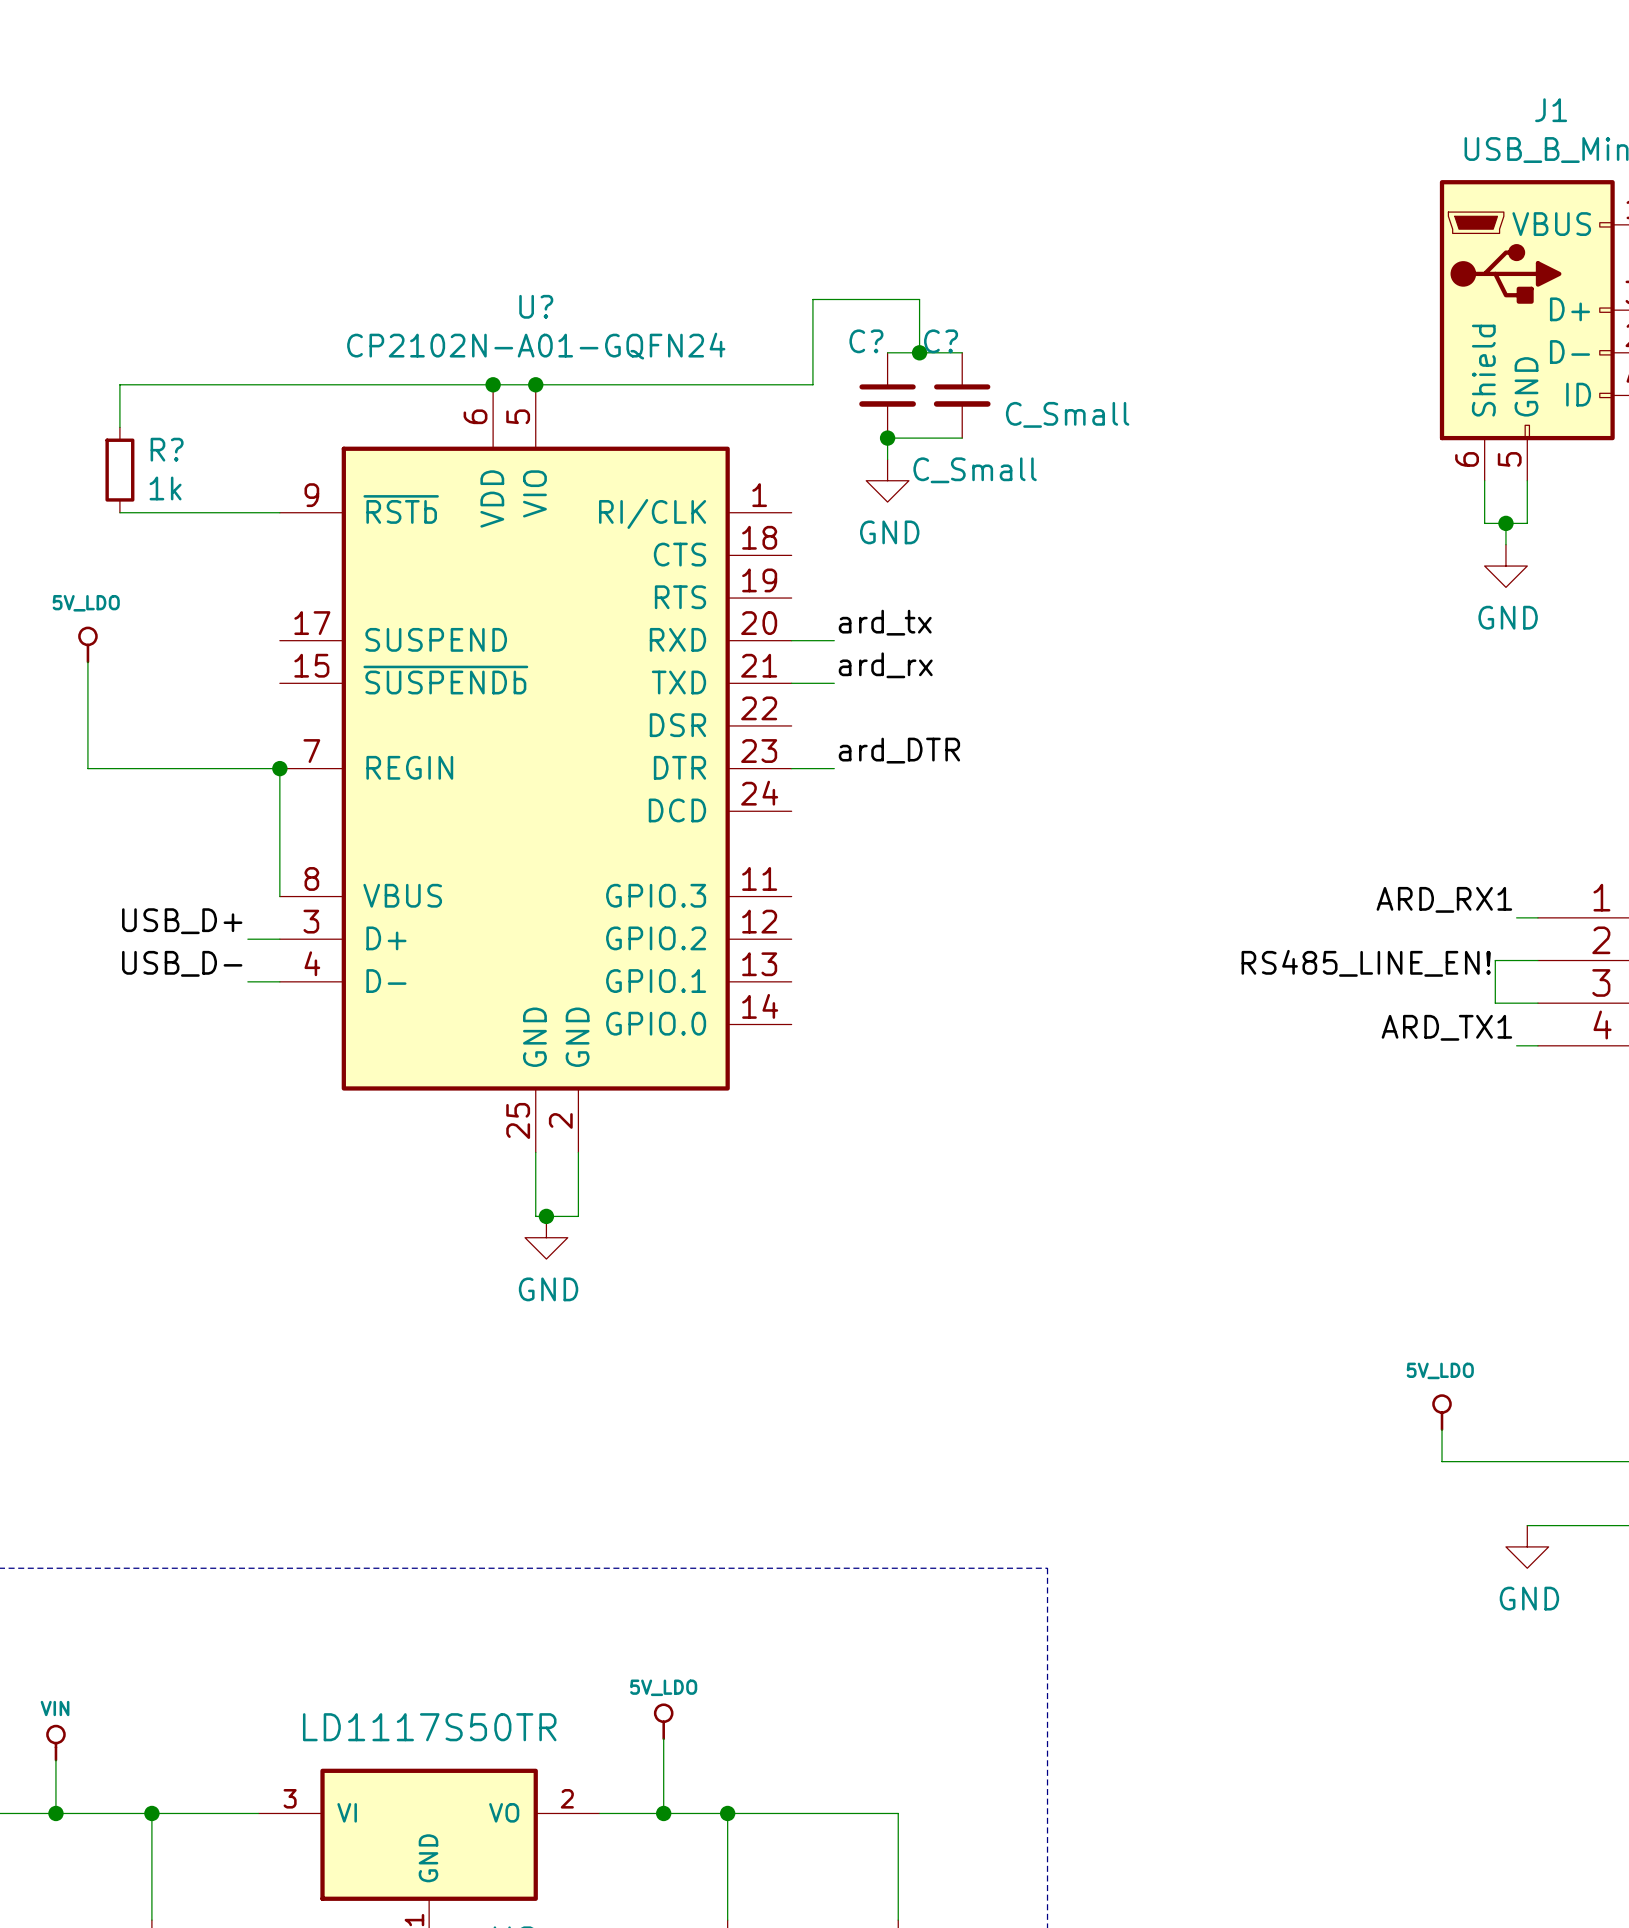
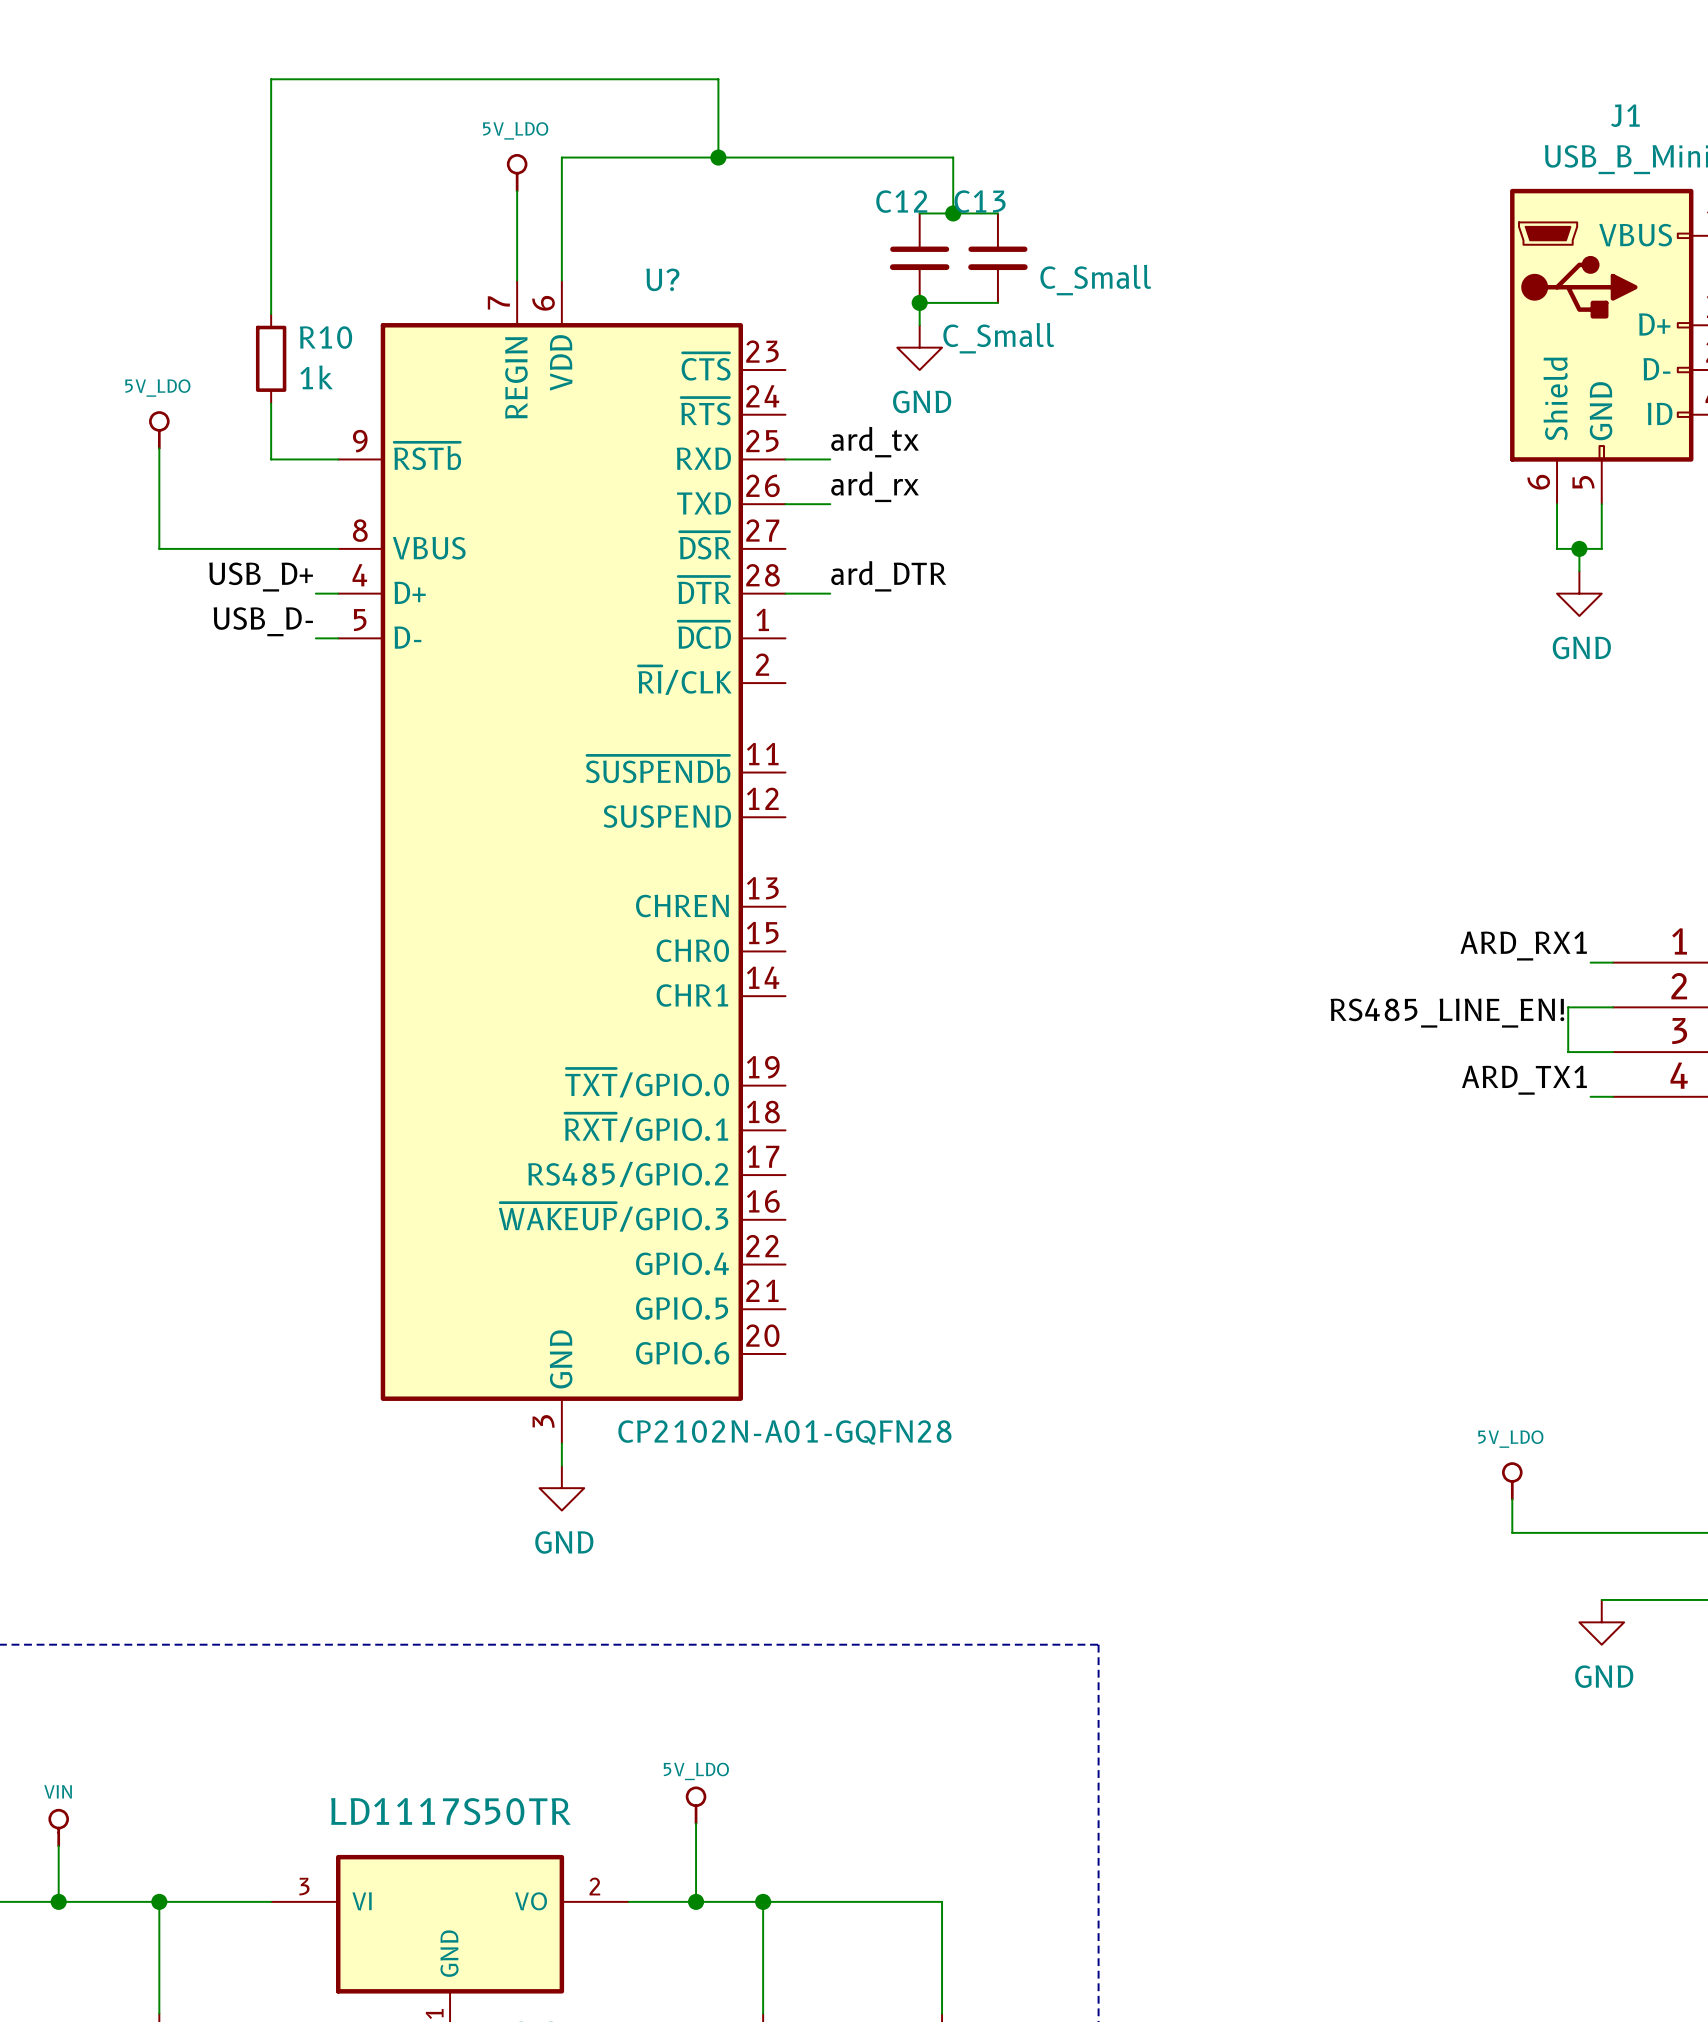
wire: none -> (718, 157) (718, 79) (271, 79) (271, 314)
junction: none -> (718, 157)
power symbol: none -> 5V_LDO (517, 173)
wire: none -> (517, 191) (517, 280)
wire: none -> (953, 213) (953, 157) (561, 157) (561, 280)
junction: none -> (953, 213)
C12: none -> C_Small (919, 258)
C13: none -> C_Small (997, 258)
junction: none -> (919, 302)
R10: none -> 1k (271, 358)
wire: (887, 352) (962, 352) -> (919, 213) (997, 213)
wire: (919, 352) (919, 299) (812, 299) (812, 384) (119, 384) (119, 427) -> none
junction: (919, 352) -> none
wire: none -> (271, 403) (271, 459) (338, 459)
junction: (493, 384) -> none
junction: (535, 384) -> none
C?: C_Small (887, 395) -> none
C?: C_Small (962, 395) -> none
wire: none -> (159, 448) (159, 548) (338, 548)
junction: (887, 438) -> none
wire: (962, 438) (887, 438) (887, 459) -> (997, 302) (919, 302) (919, 325)
R?: 1k (119, 470) -> none
power symbol position: GND (887, 480) -> GND (919, 347)
wire: (119, 512) (279, 512) -> none
wire: none -> (315, 593) (338, 593)
wire: none -> (315, 638) (338, 638)
label position: ard_tx (885, 622) -> ard_tx (875, 442)
wire: (791, 640) (834, 640) -> (785, 459) (830, 459)
power symbol position: 5V_LDO (87, 644) -> 5V_LDO (159, 430)
wire: (87, 661) (87, 768) (279, 768) (279, 896) -> none
label position: ard_rx (885, 665) -> ard_rx (875, 486)
wire: (791, 683) (834, 683) -> (785, 504) (830, 504)
label position: ard_DTR (899, 750) -> ard_DTR (888, 576)
junction: (279, 768) -> none
U?: CP2102N-A01-GQFN24 (535, 768) -> none
wire: (791, 768) (834, 768) -> (785, 593) (830, 593)
U?: none -> CP2102N-A01-GQFN28 (561, 861)
label position: USB_D+ (182, 921) -> USB_D+ (261, 577)
wire: (247, 939) (279, 939) -> none
label position: USB_D- (182, 963) -> USB_D- (263, 621)
wire: (247, 981) (279, 981) -> none
junction: (546, 1216) -> none
power symbol position: GND (546, 1237) -> GND (561, 1488)
wire: none -> (561, 1443) (561, 1465)

